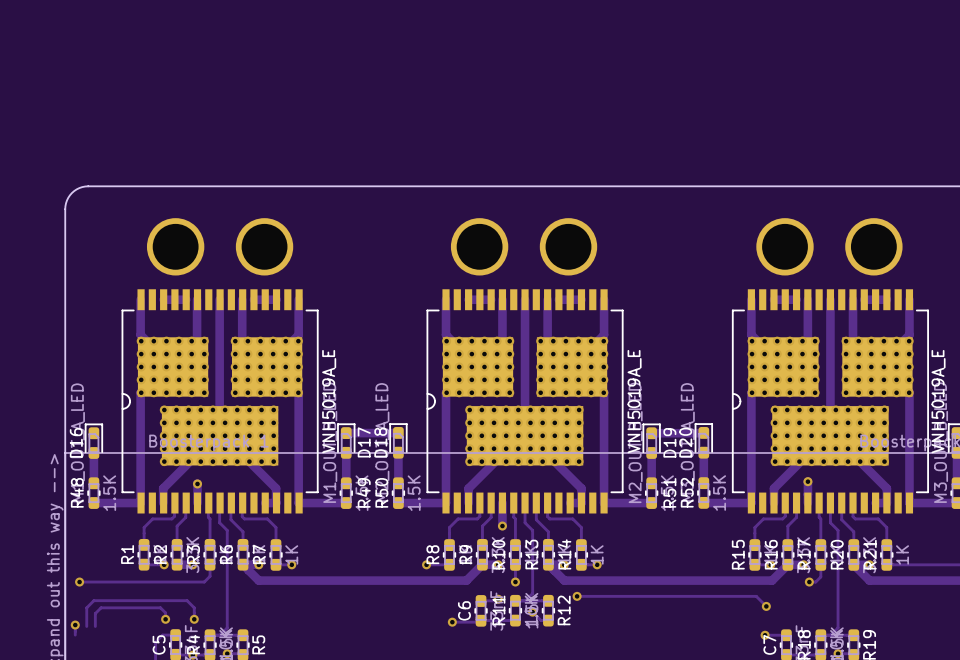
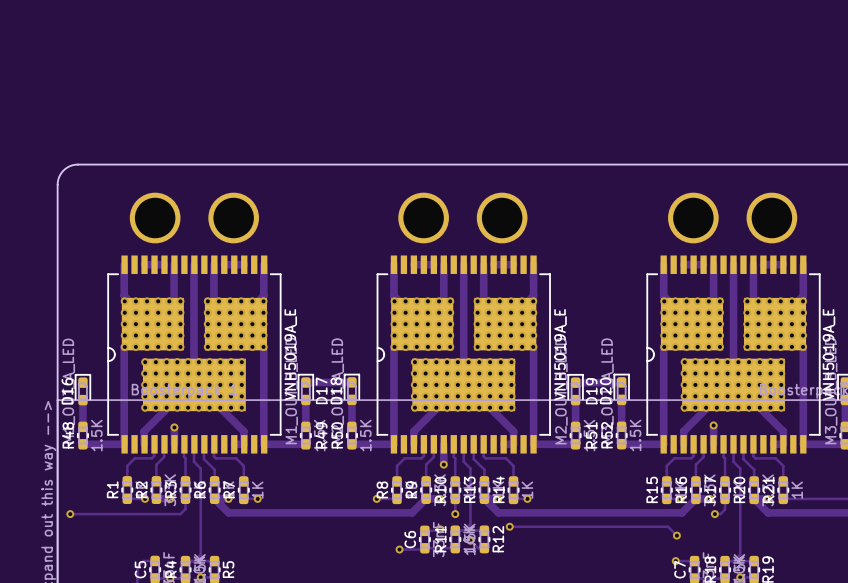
track: (165, 619) (165, 612) (160, 607) (101, 607) (95, 613) (95, 626) -> none
via: (165, 619) -> none
track: (194, 619) (194, 607) (187, 600) (93, 600) (86, 607) (86, 626) -> none
via: (194, 619) -> none
track: (75, 625) (75, 635) -> none
via: (75, 625) -> none

